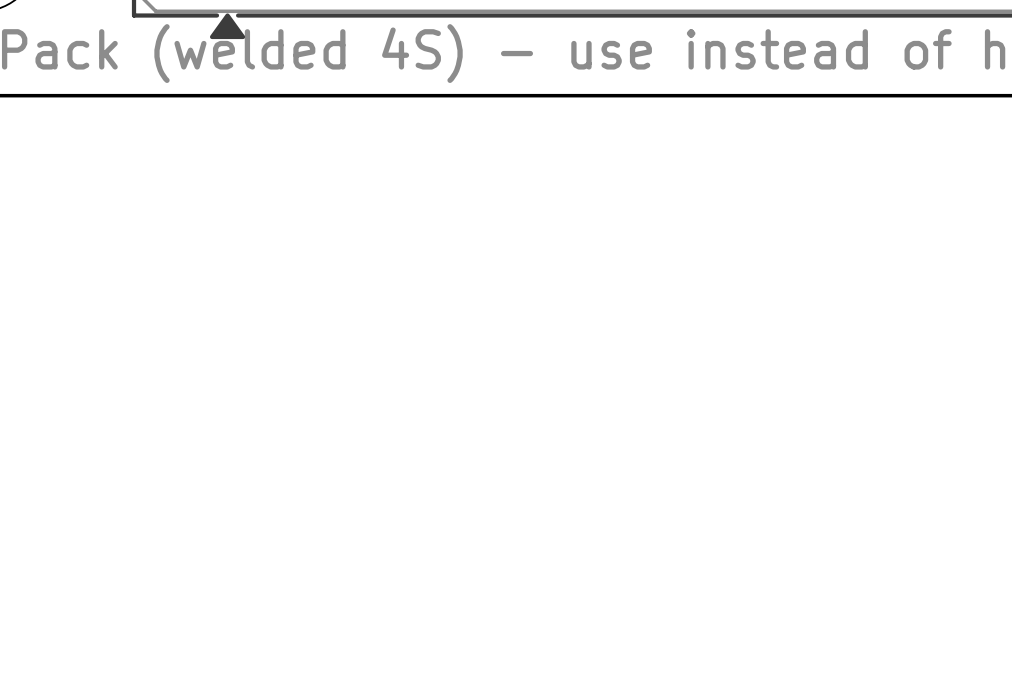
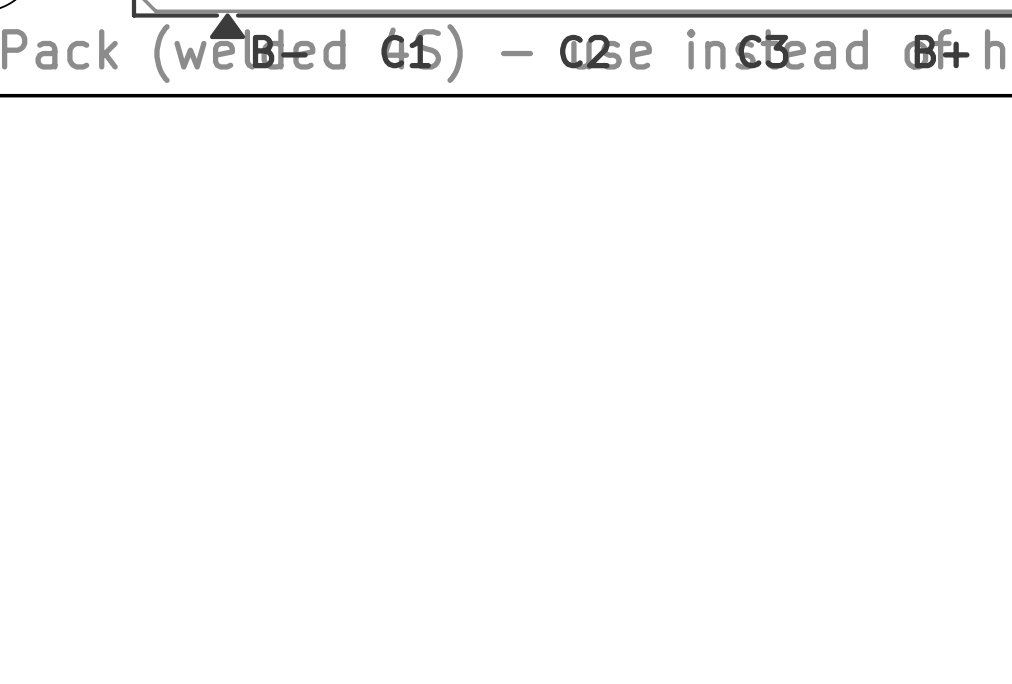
text: none -> B- (280, 51)
text: none -> C1 (406, 51)
text: none -> C2 (584, 51)
text: none -> C3 (763, 51)
text: none -> B+ (942, 51)

